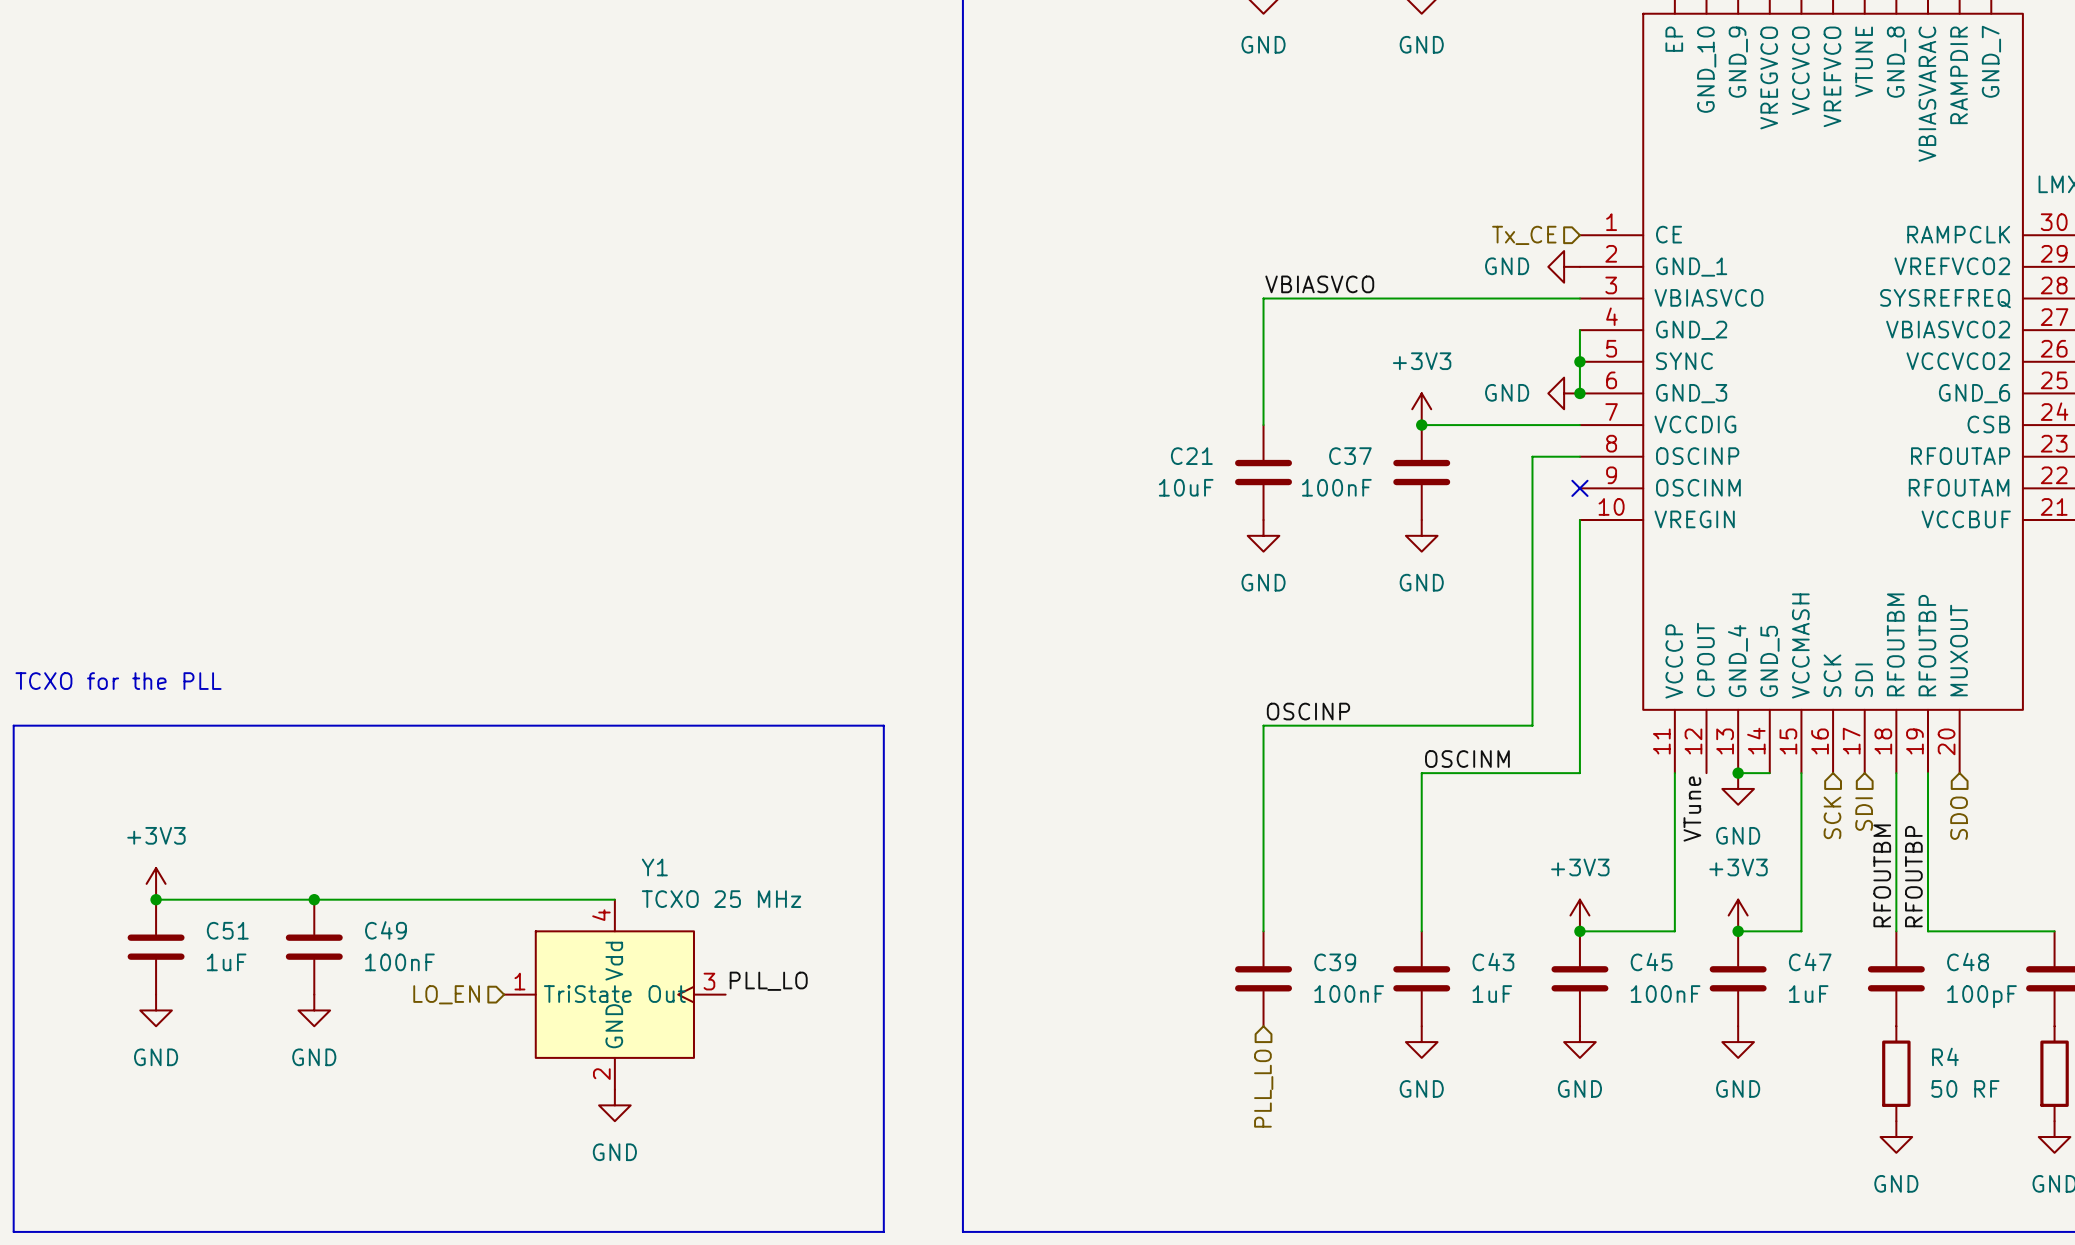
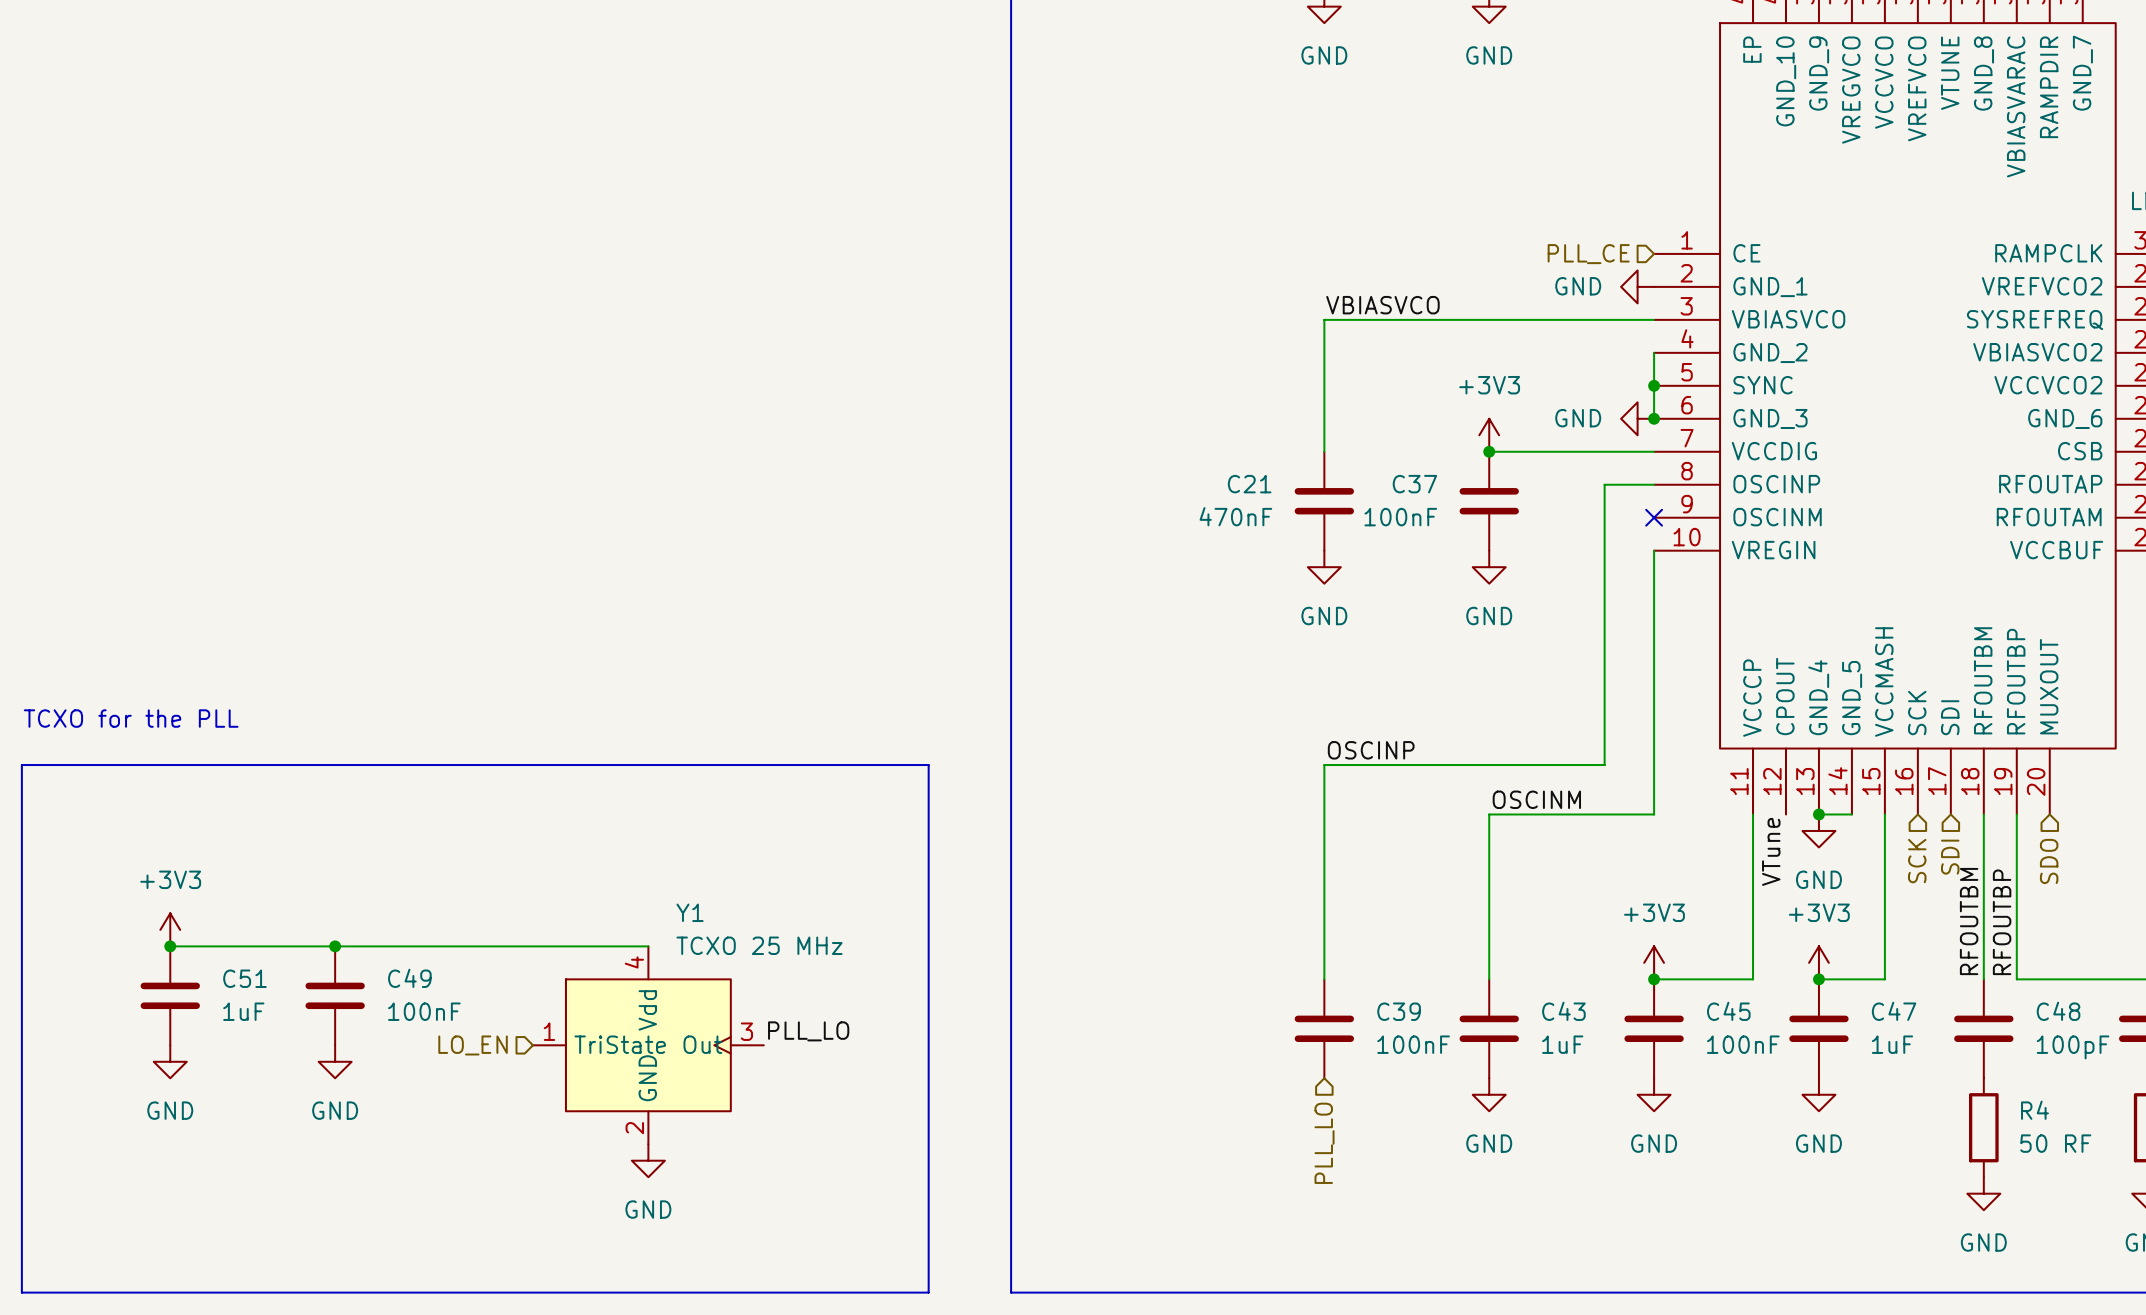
hierarchical label: Tx_CE (1524, 235) -> PLL_CE (1588, 254)
C21 value: 10uF (1186, 487) -> 470nF (1235, 516)

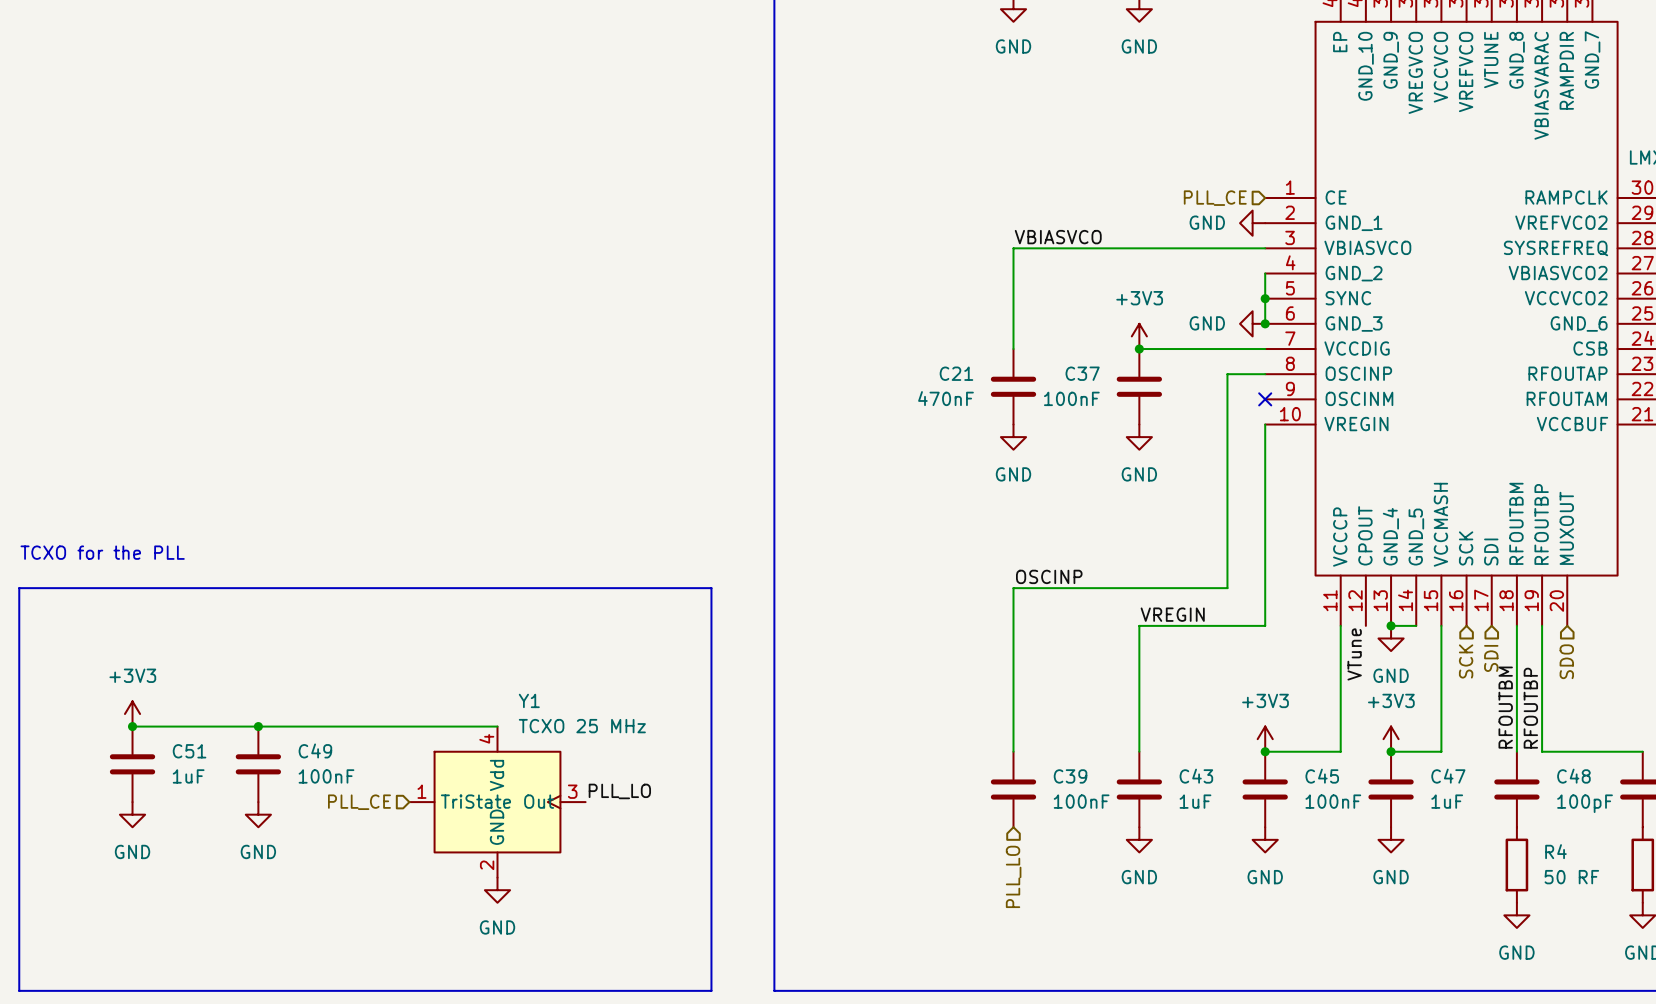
label: OSCINM (1536, 799) -> VREGIN (1172, 614)
hierarchical label: LO_EN (473, 1045) -> PLL_CE (359, 802)

